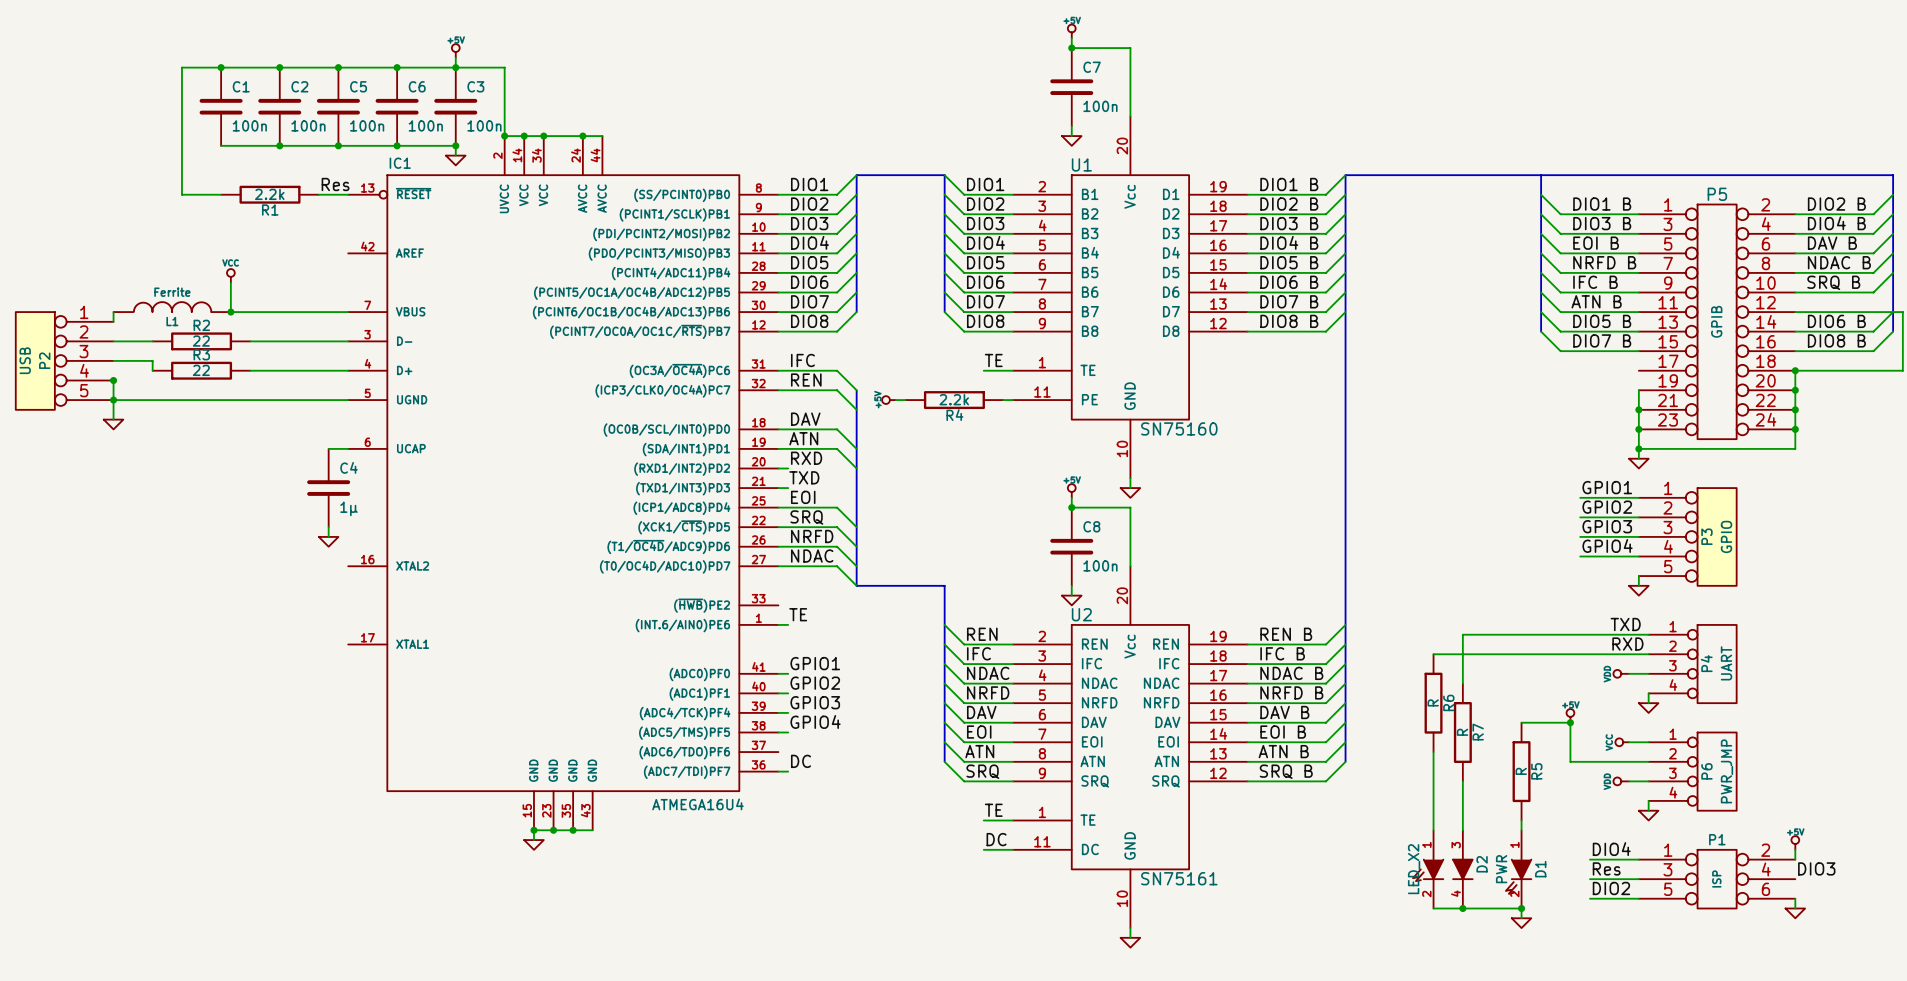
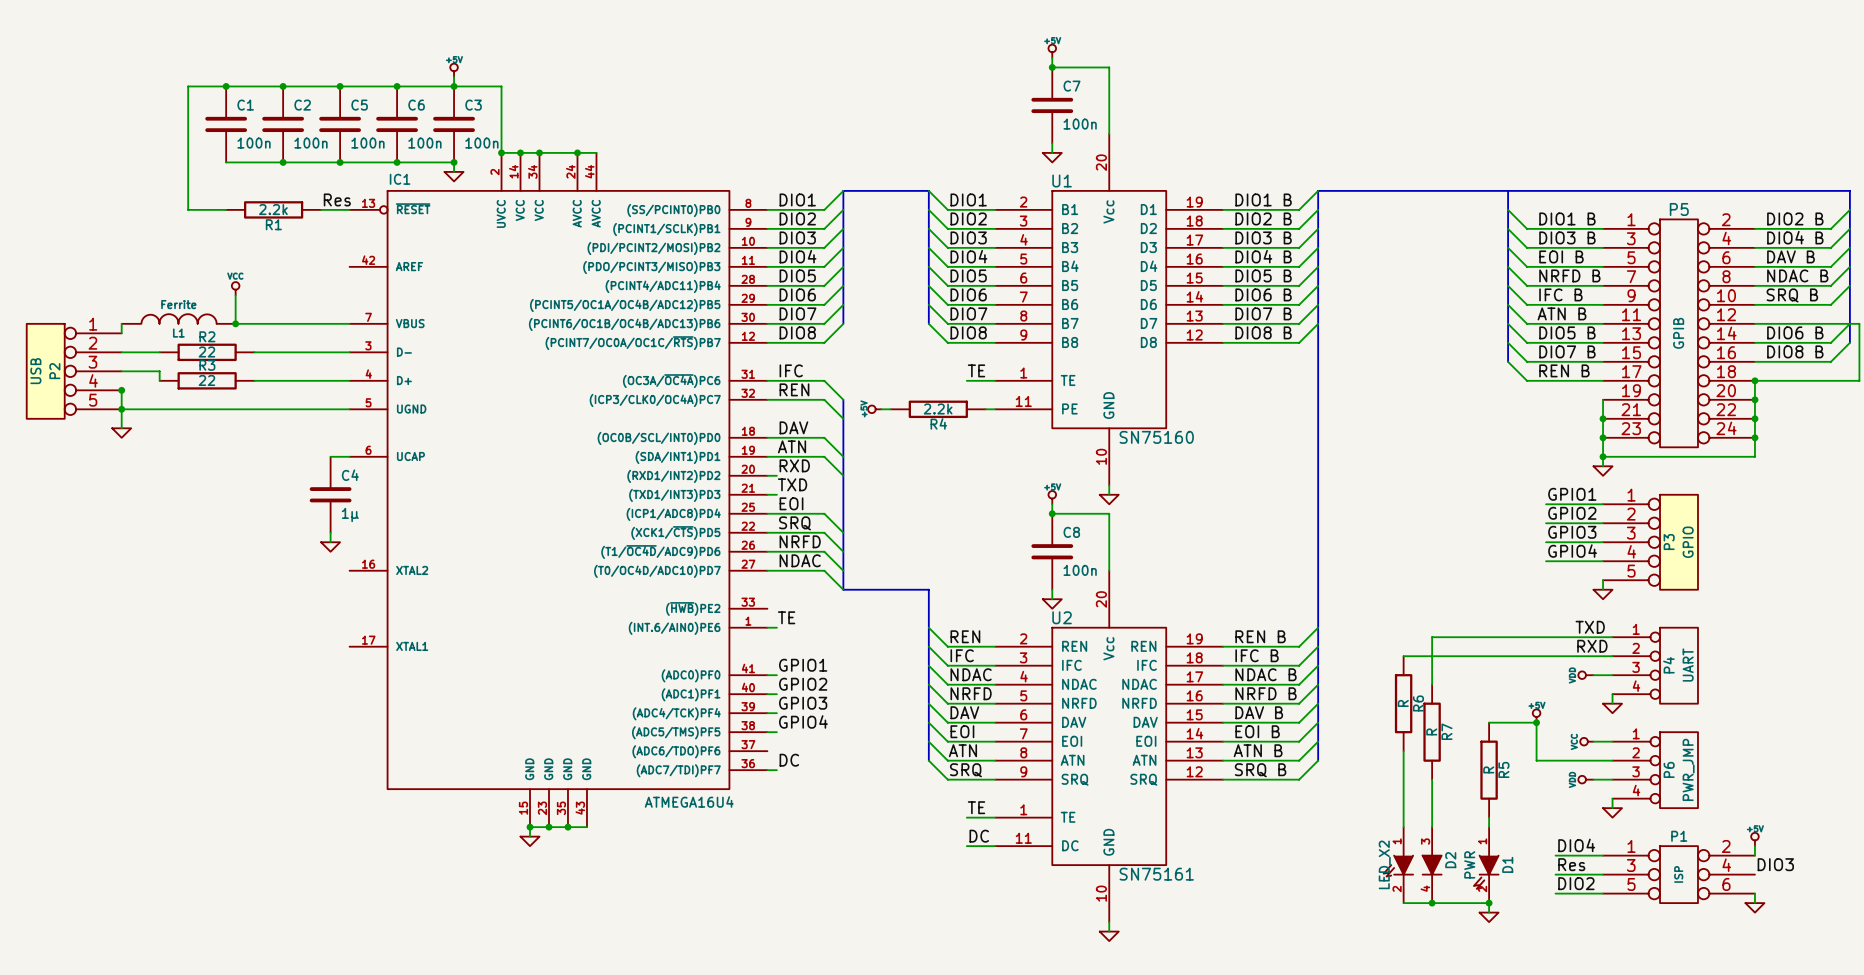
bus: none -> (1508, 342) (1508, 361)
wire: none -> (1508, 361) (1527, 380) (1603, 380)
label: none -> REN B (1564, 370)

